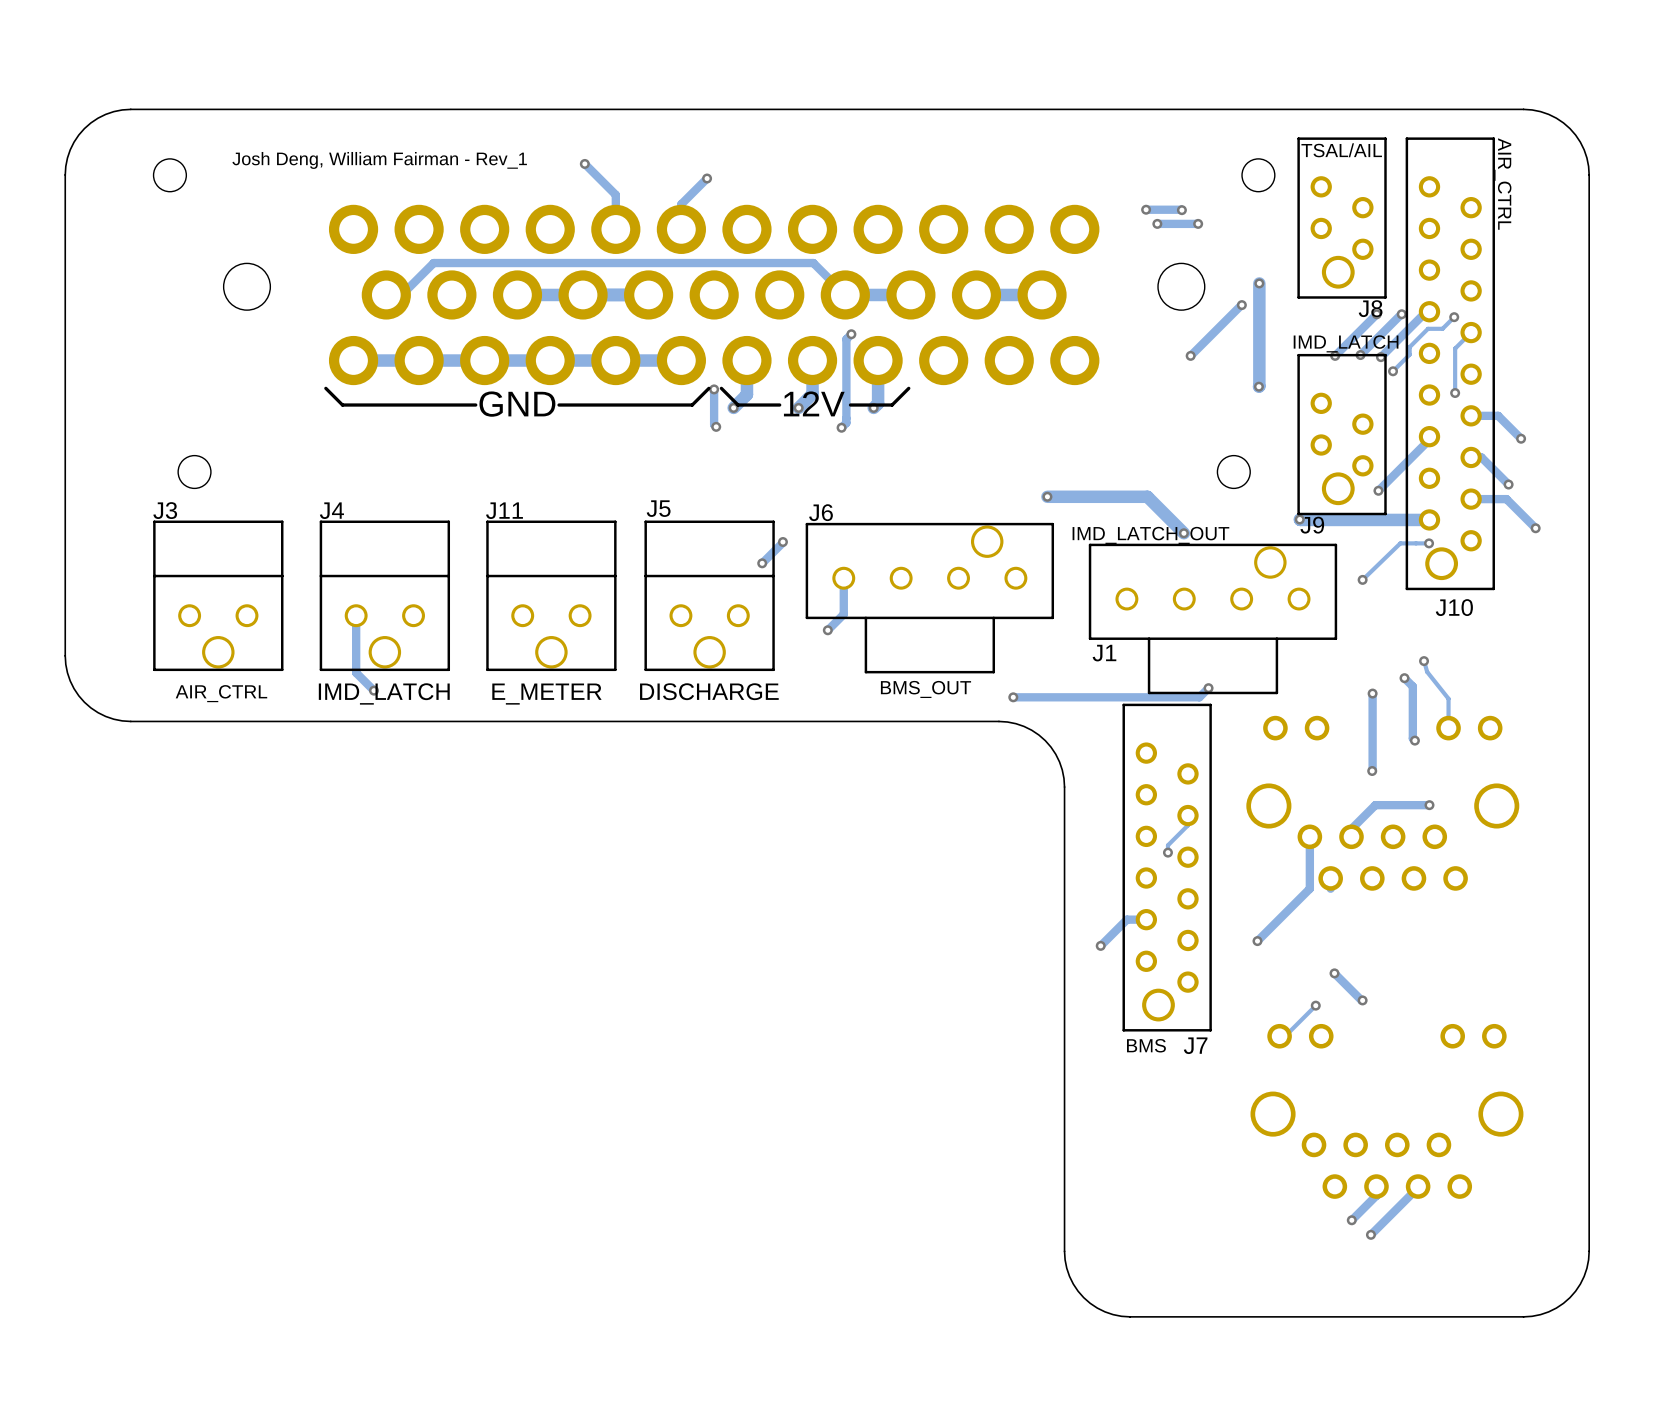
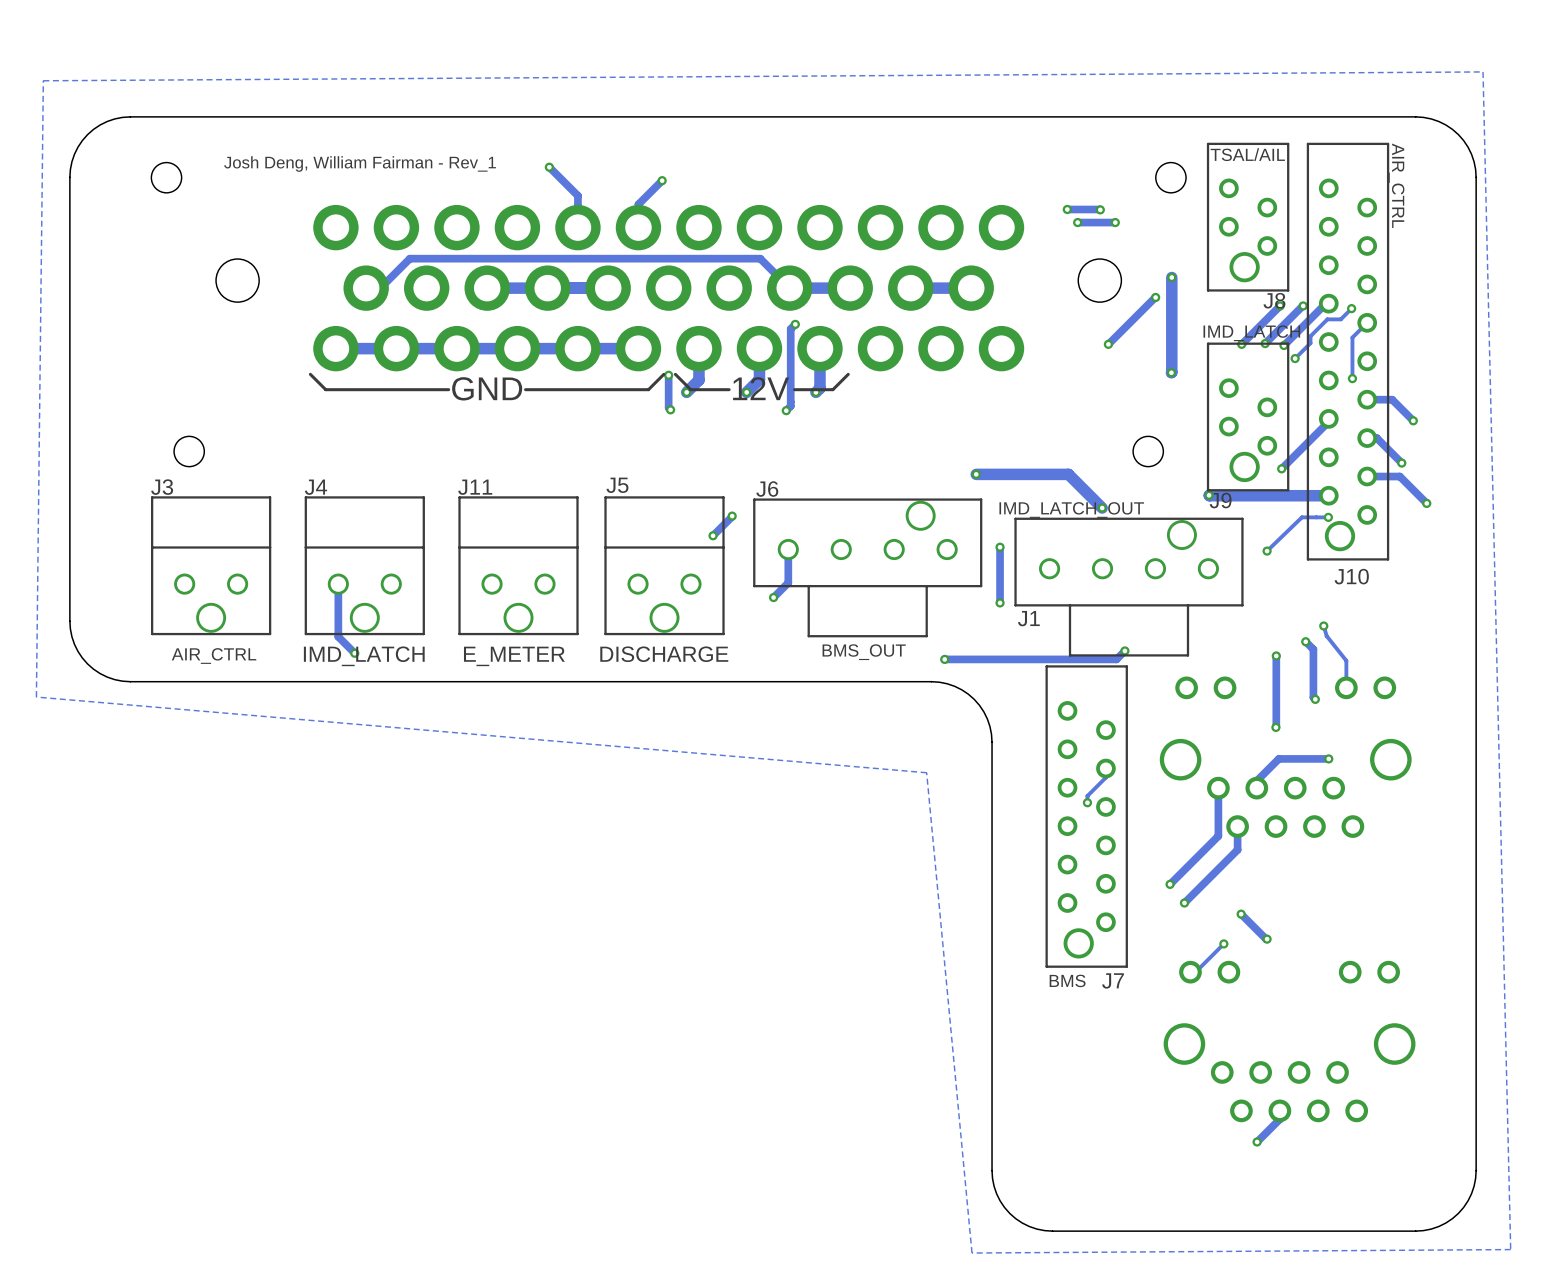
zone outline: none -> (1483, 71) (1510, 1249) (972, 1253) (926, 772) (36, 697) (43, 80) (1483, 71)
track: none -> (1000, 547) (1000, 602)
via: none -> (1000, 547)
via: none -> (1000, 602)
track: none -> (1237, 836) (1237, 849) (1184, 903)
track: (1146, 919) (1126, 919) (1100, 945) -> none
via: (1100, 945) -> none
via: none -> (1184, 903)
track: (1418, 1187) (1370, 1234) -> none
via: (1370, 1234) -> none

